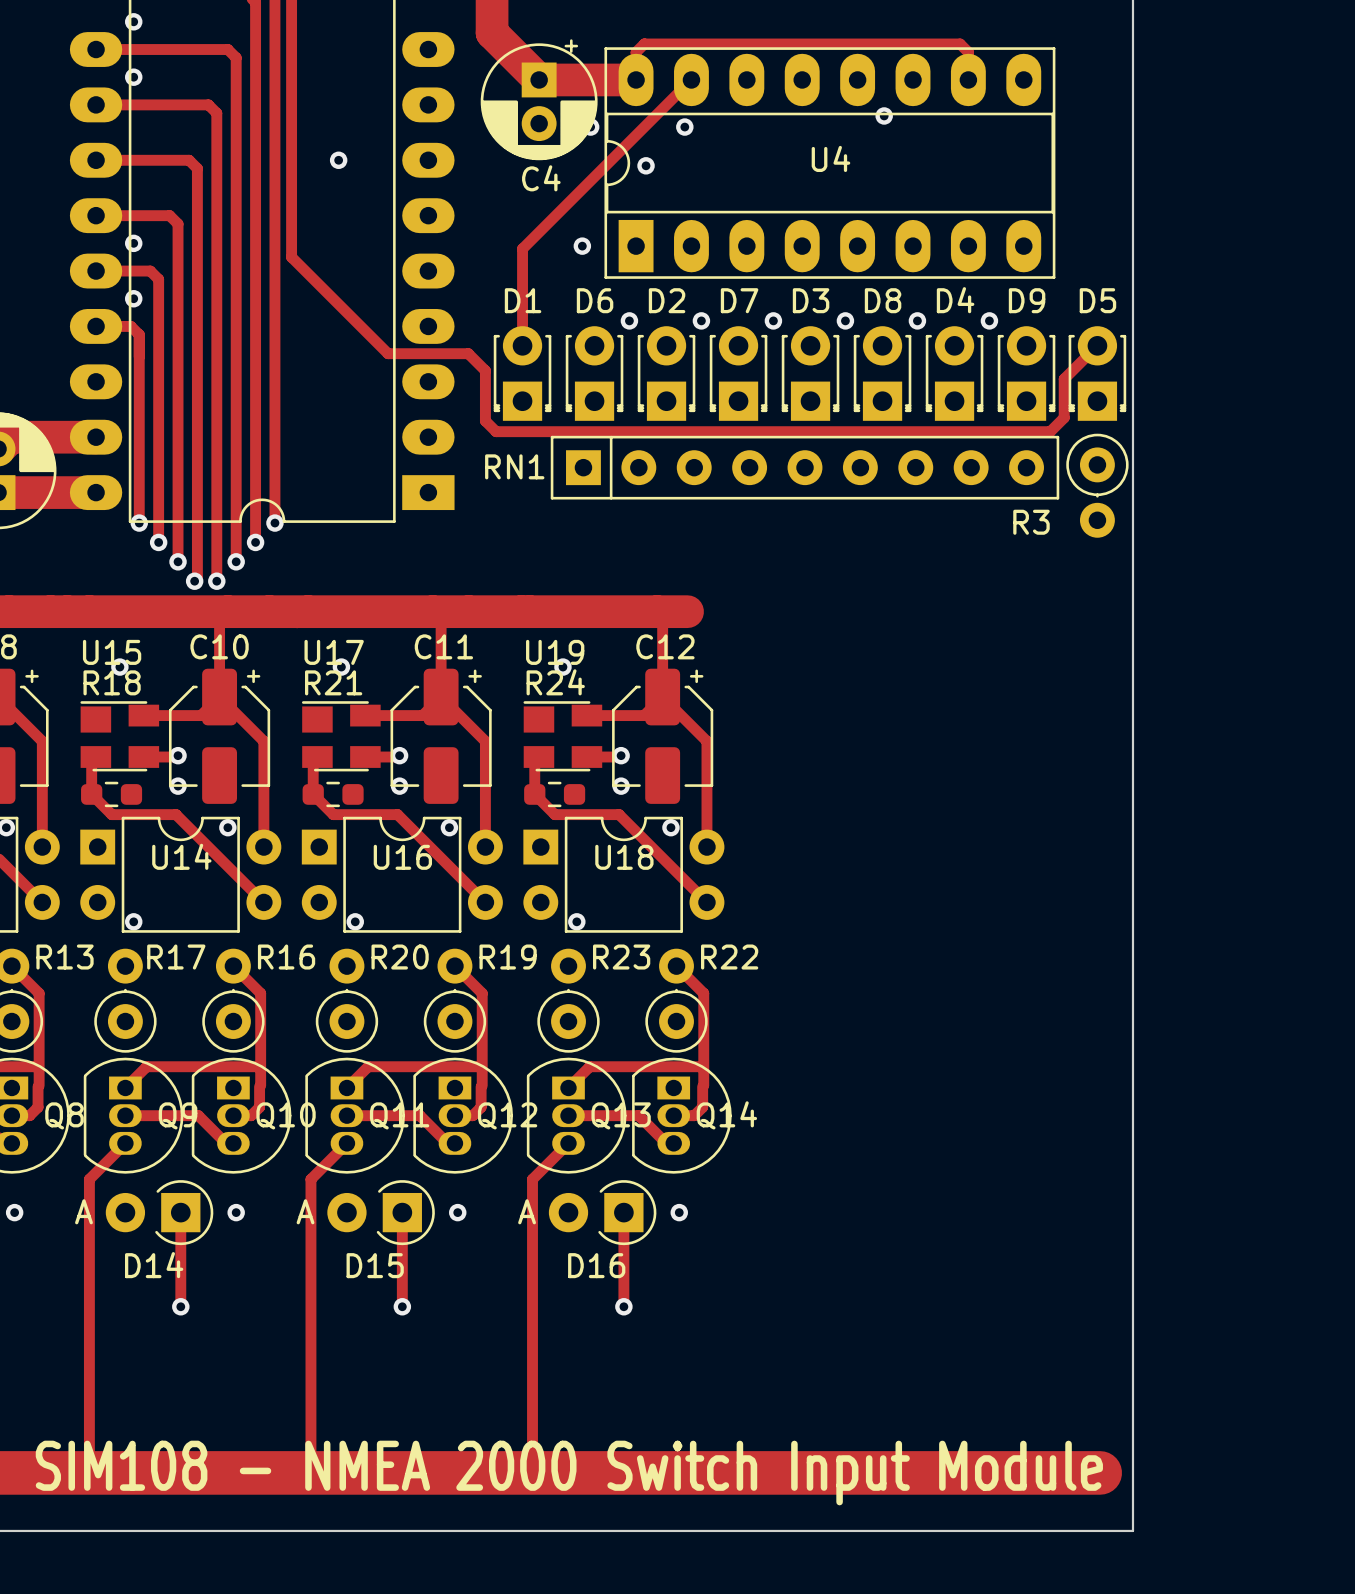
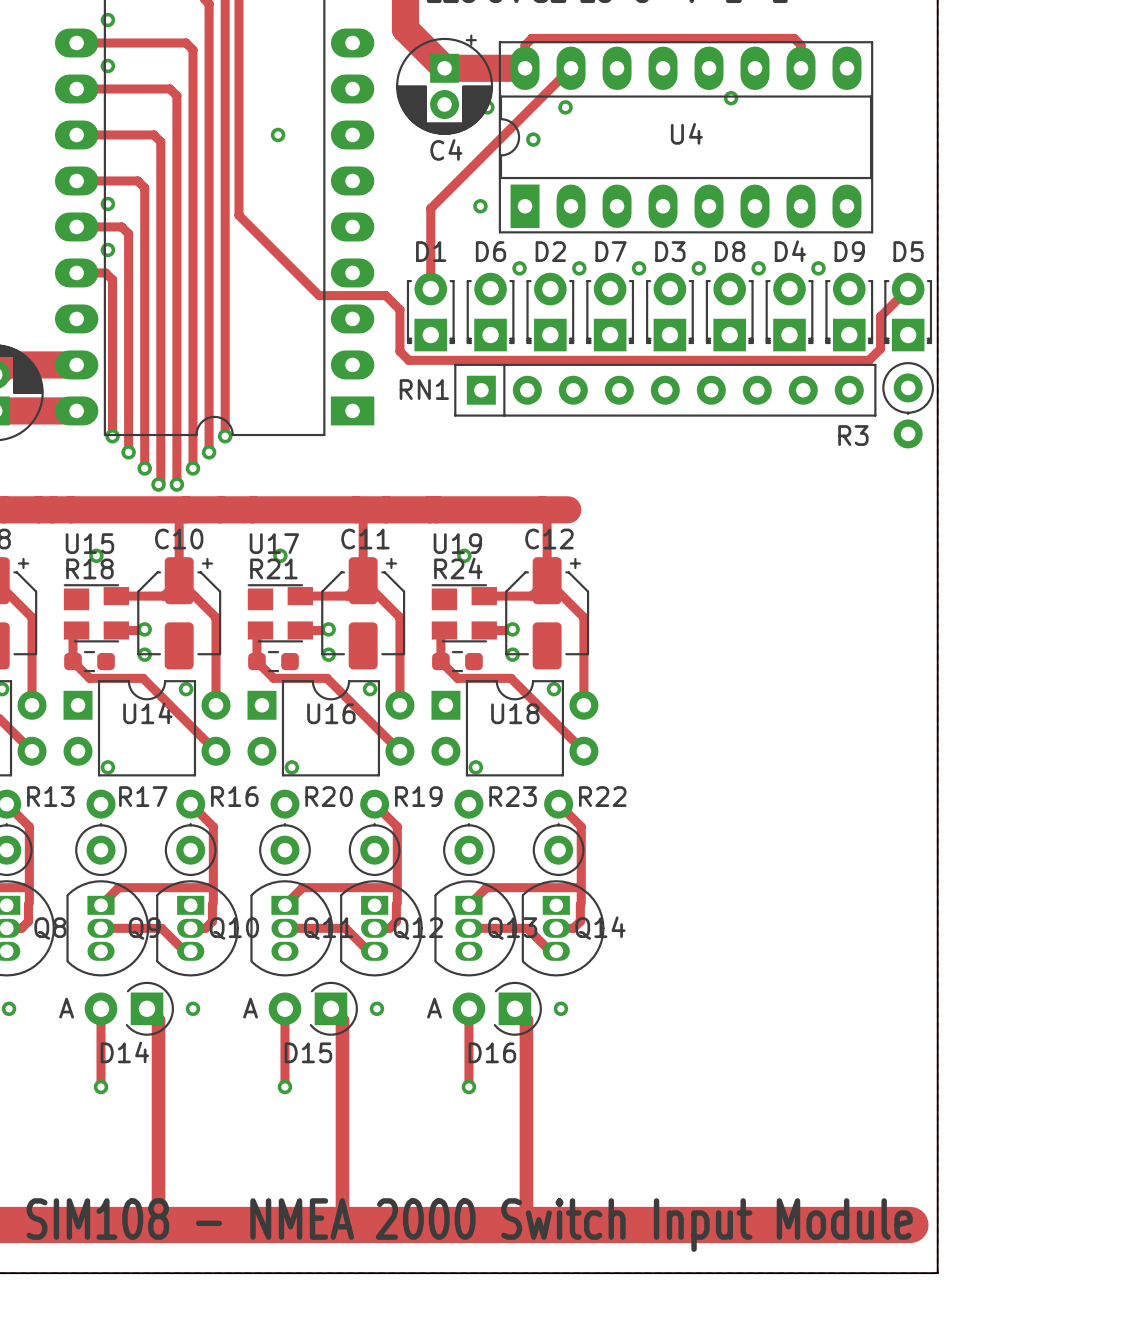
track: (125, 1143) (89, 1179) (89, 1459) -> none
track: (346, 1143) (310, 1179) (310, 1459) -> none
track: (568, 1143) (532, 1179) (532, 1459) -> none
track: none -> (101, 1008) (101, 1087)
track: (180, 1212) (180, 1306) -> (147, 1008) (158, 1020) (158, 1218)
track: none -> (284, 1008) (284, 1087)
track: (402, 1212) (402, 1306) -> (330, 1008) (342, 1020) (342, 1218)
track: none -> (468, 1008) (468, 1087)
track: (623, 1212) (623, 1306) -> (514, 1008) (526, 1020) (526, 1218)
via position: (180, 1306) -> (101, 1087)
via position: (402, 1306) -> (284, 1087)
via position: (623, 1306) -> (468, 1087)

